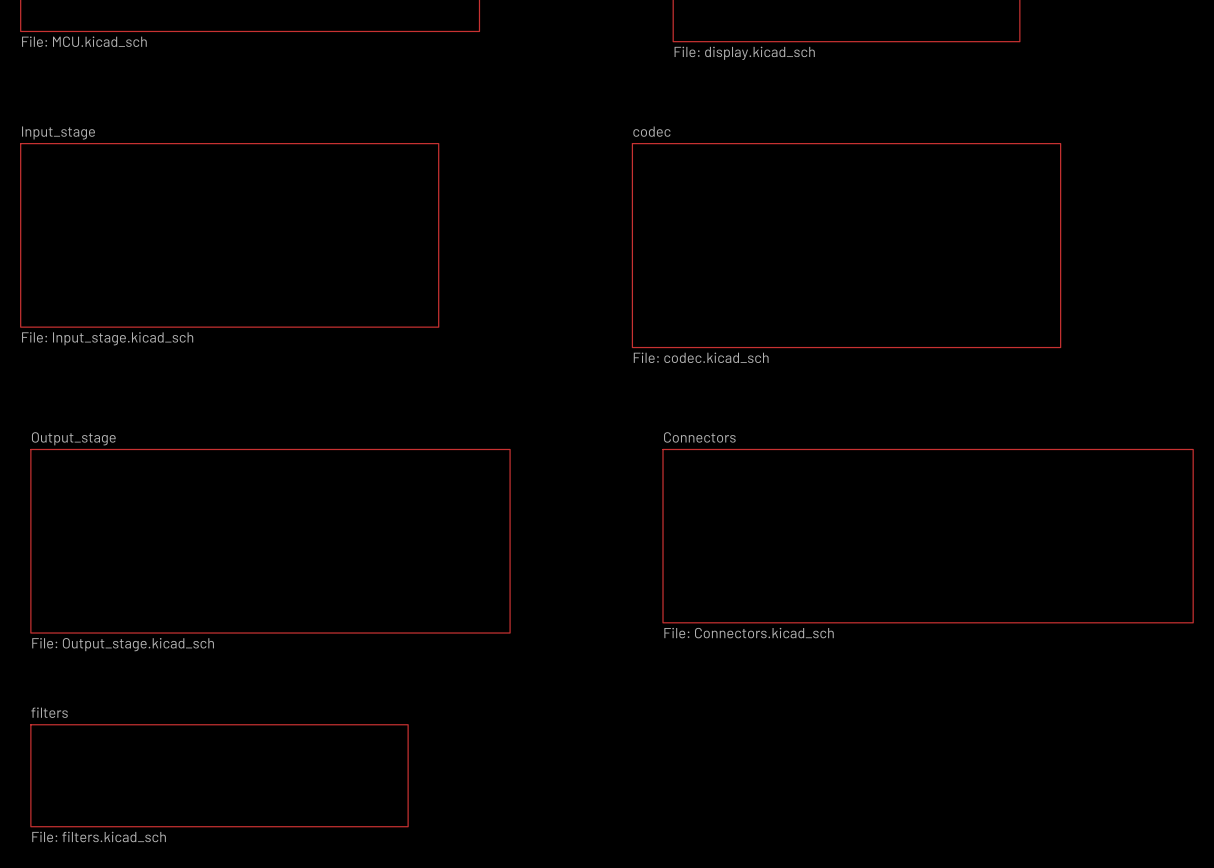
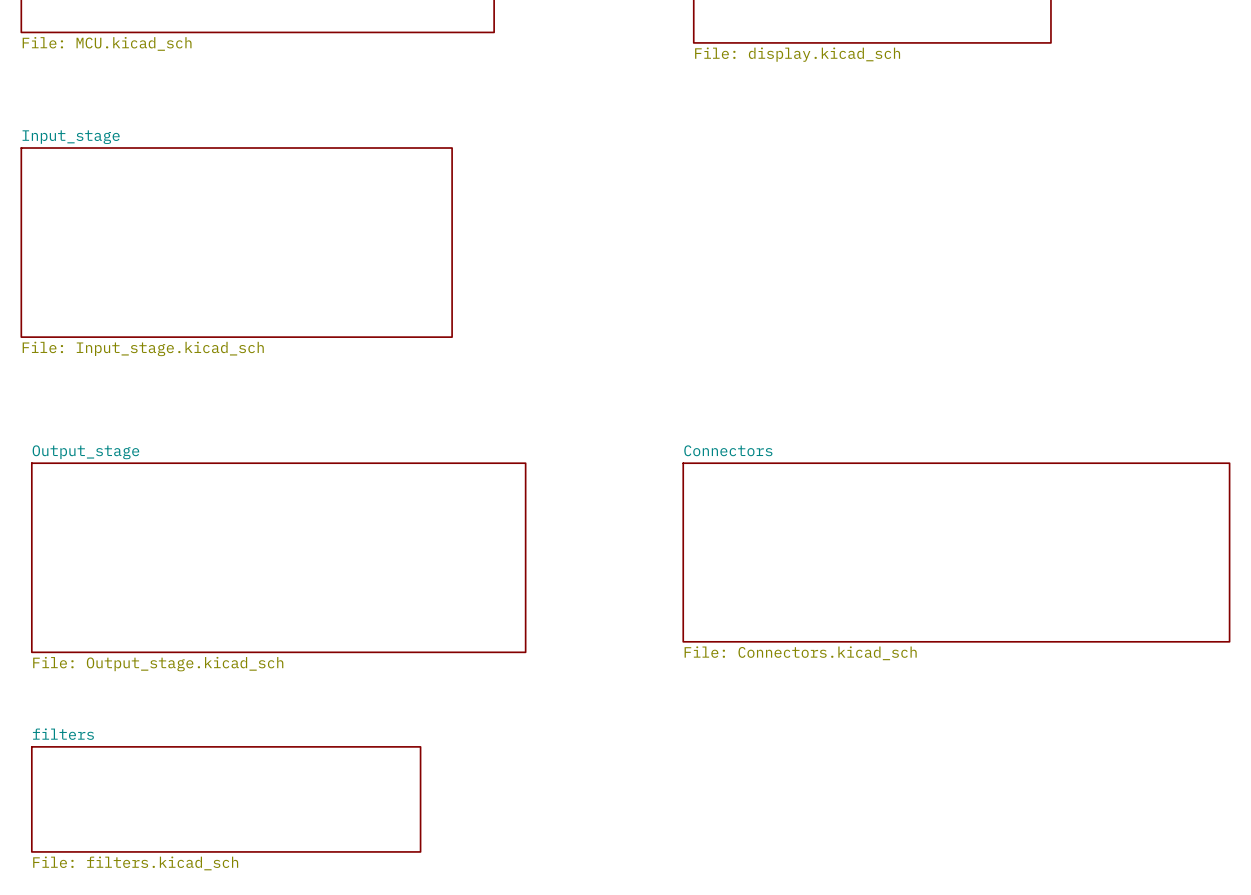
sheet codec: File: codec.kicad_sch (846, 245) -> none

